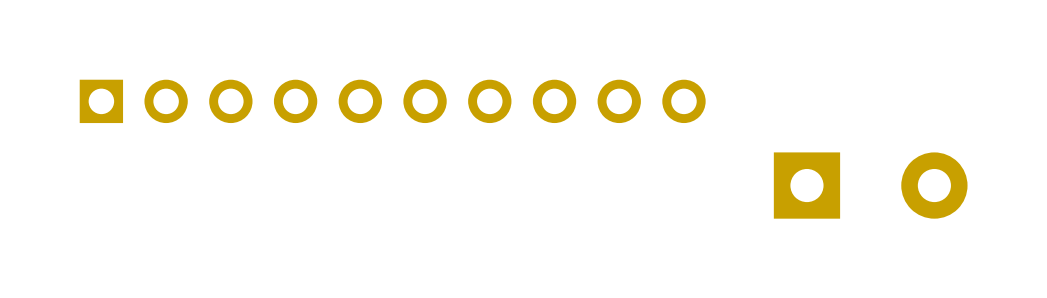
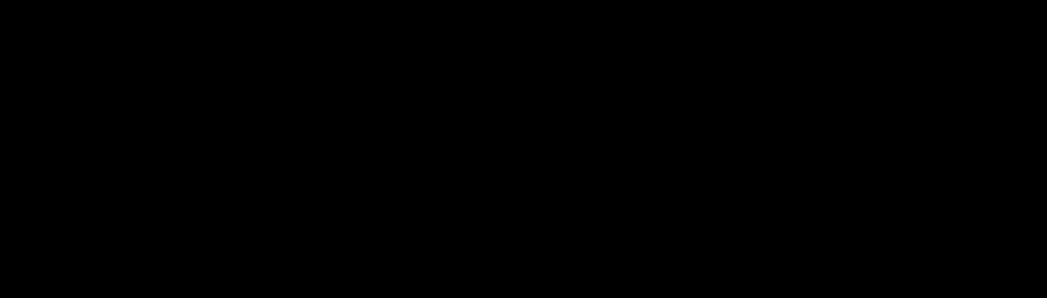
part: (392, 101) -> none
part: (870, 185) -> none

